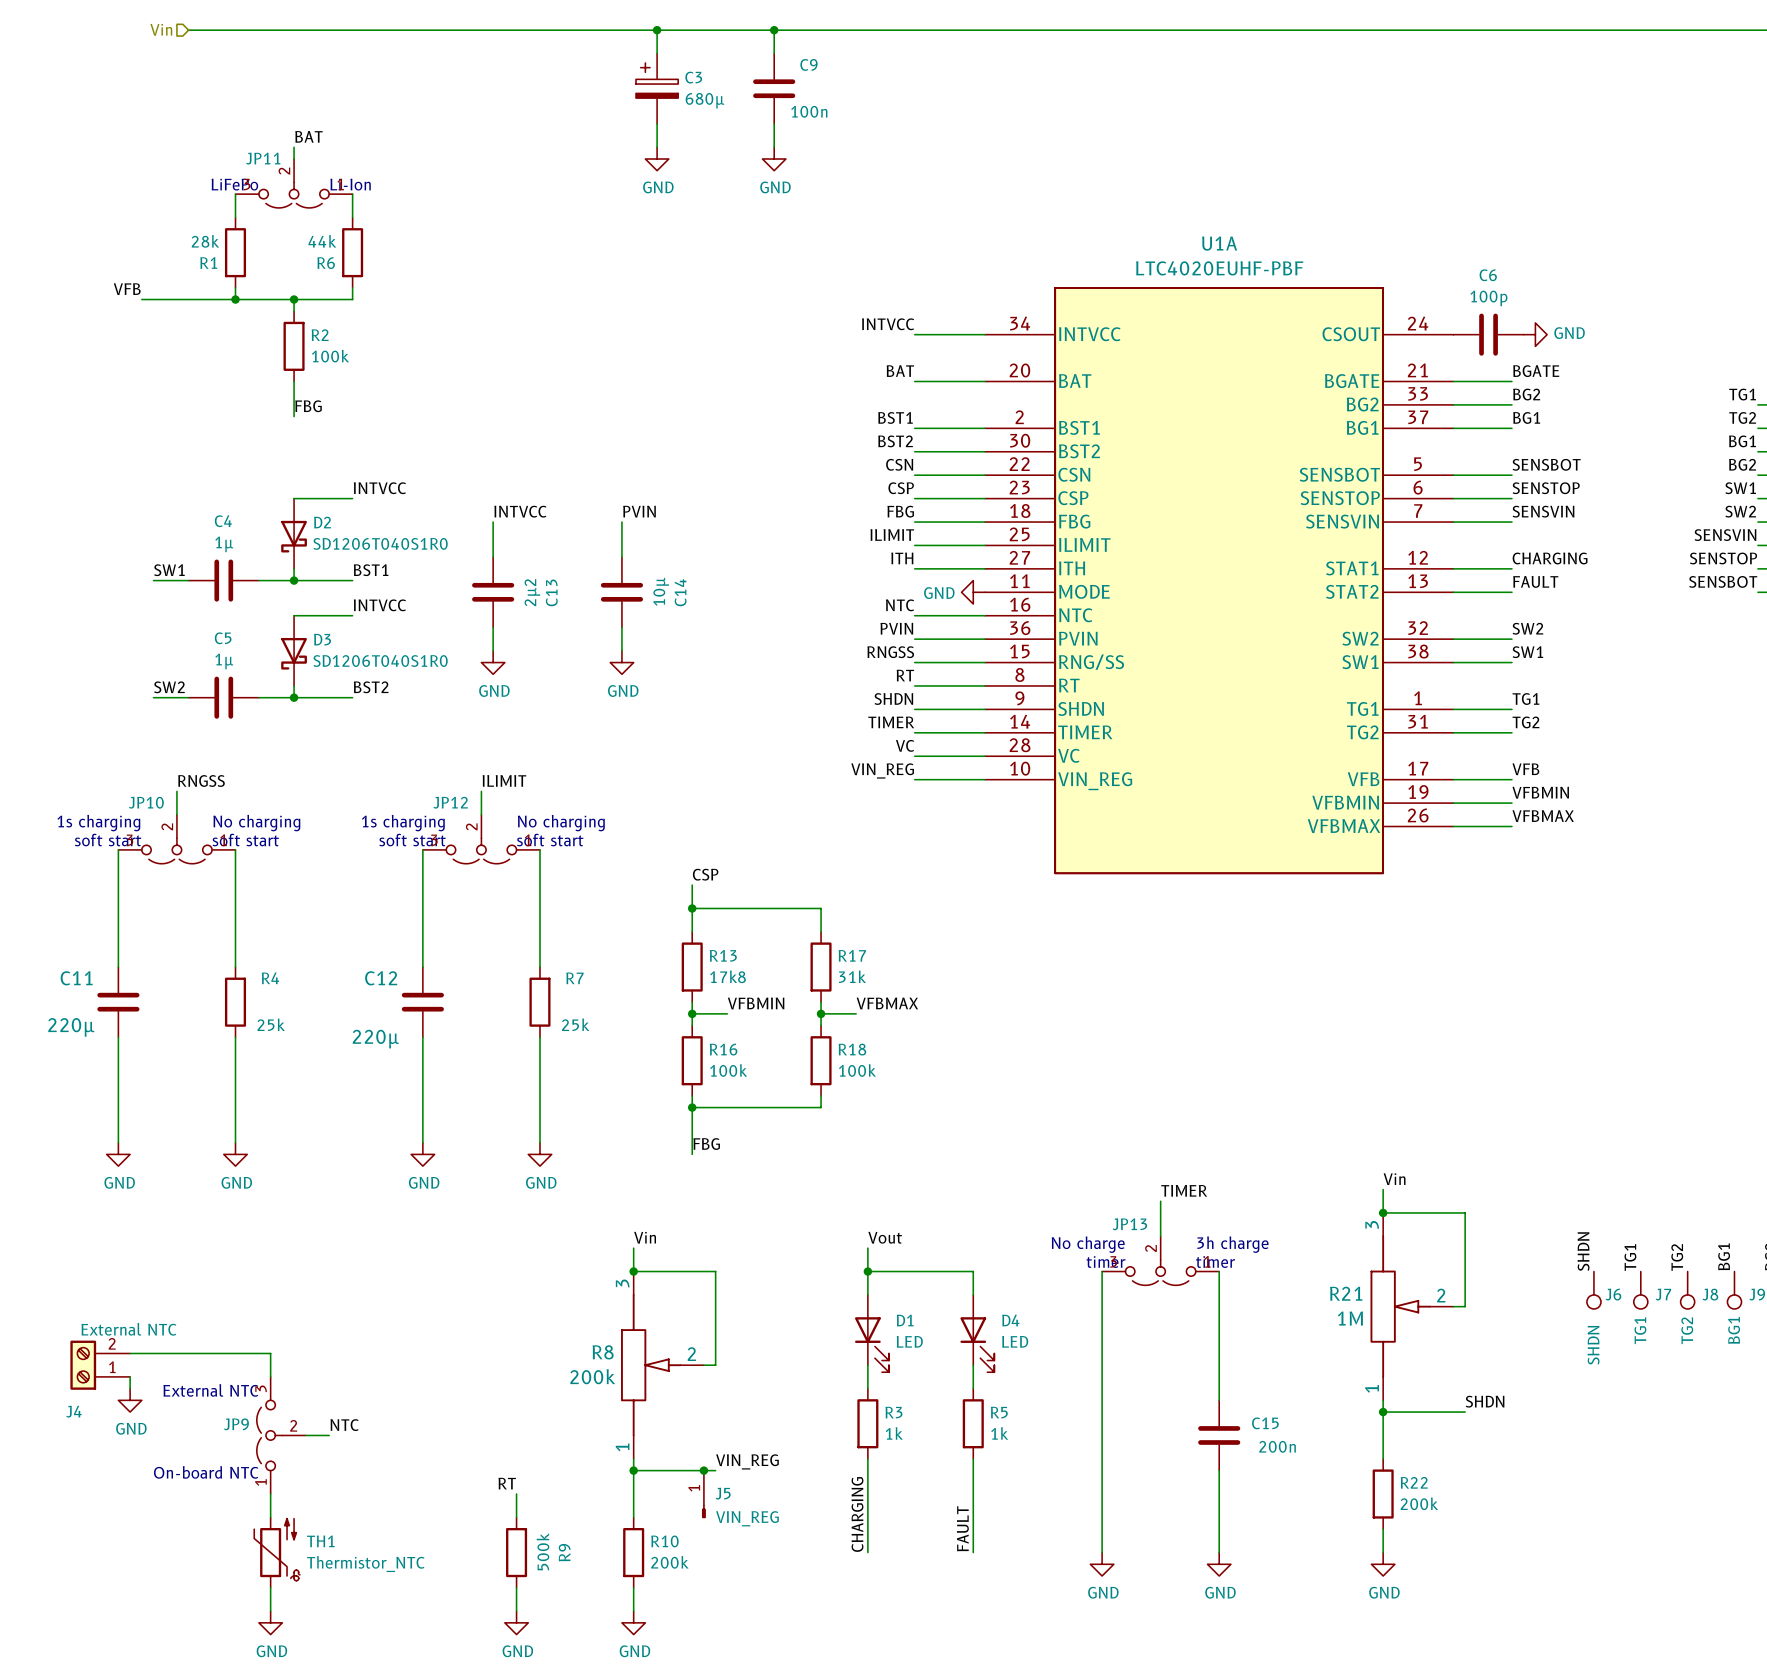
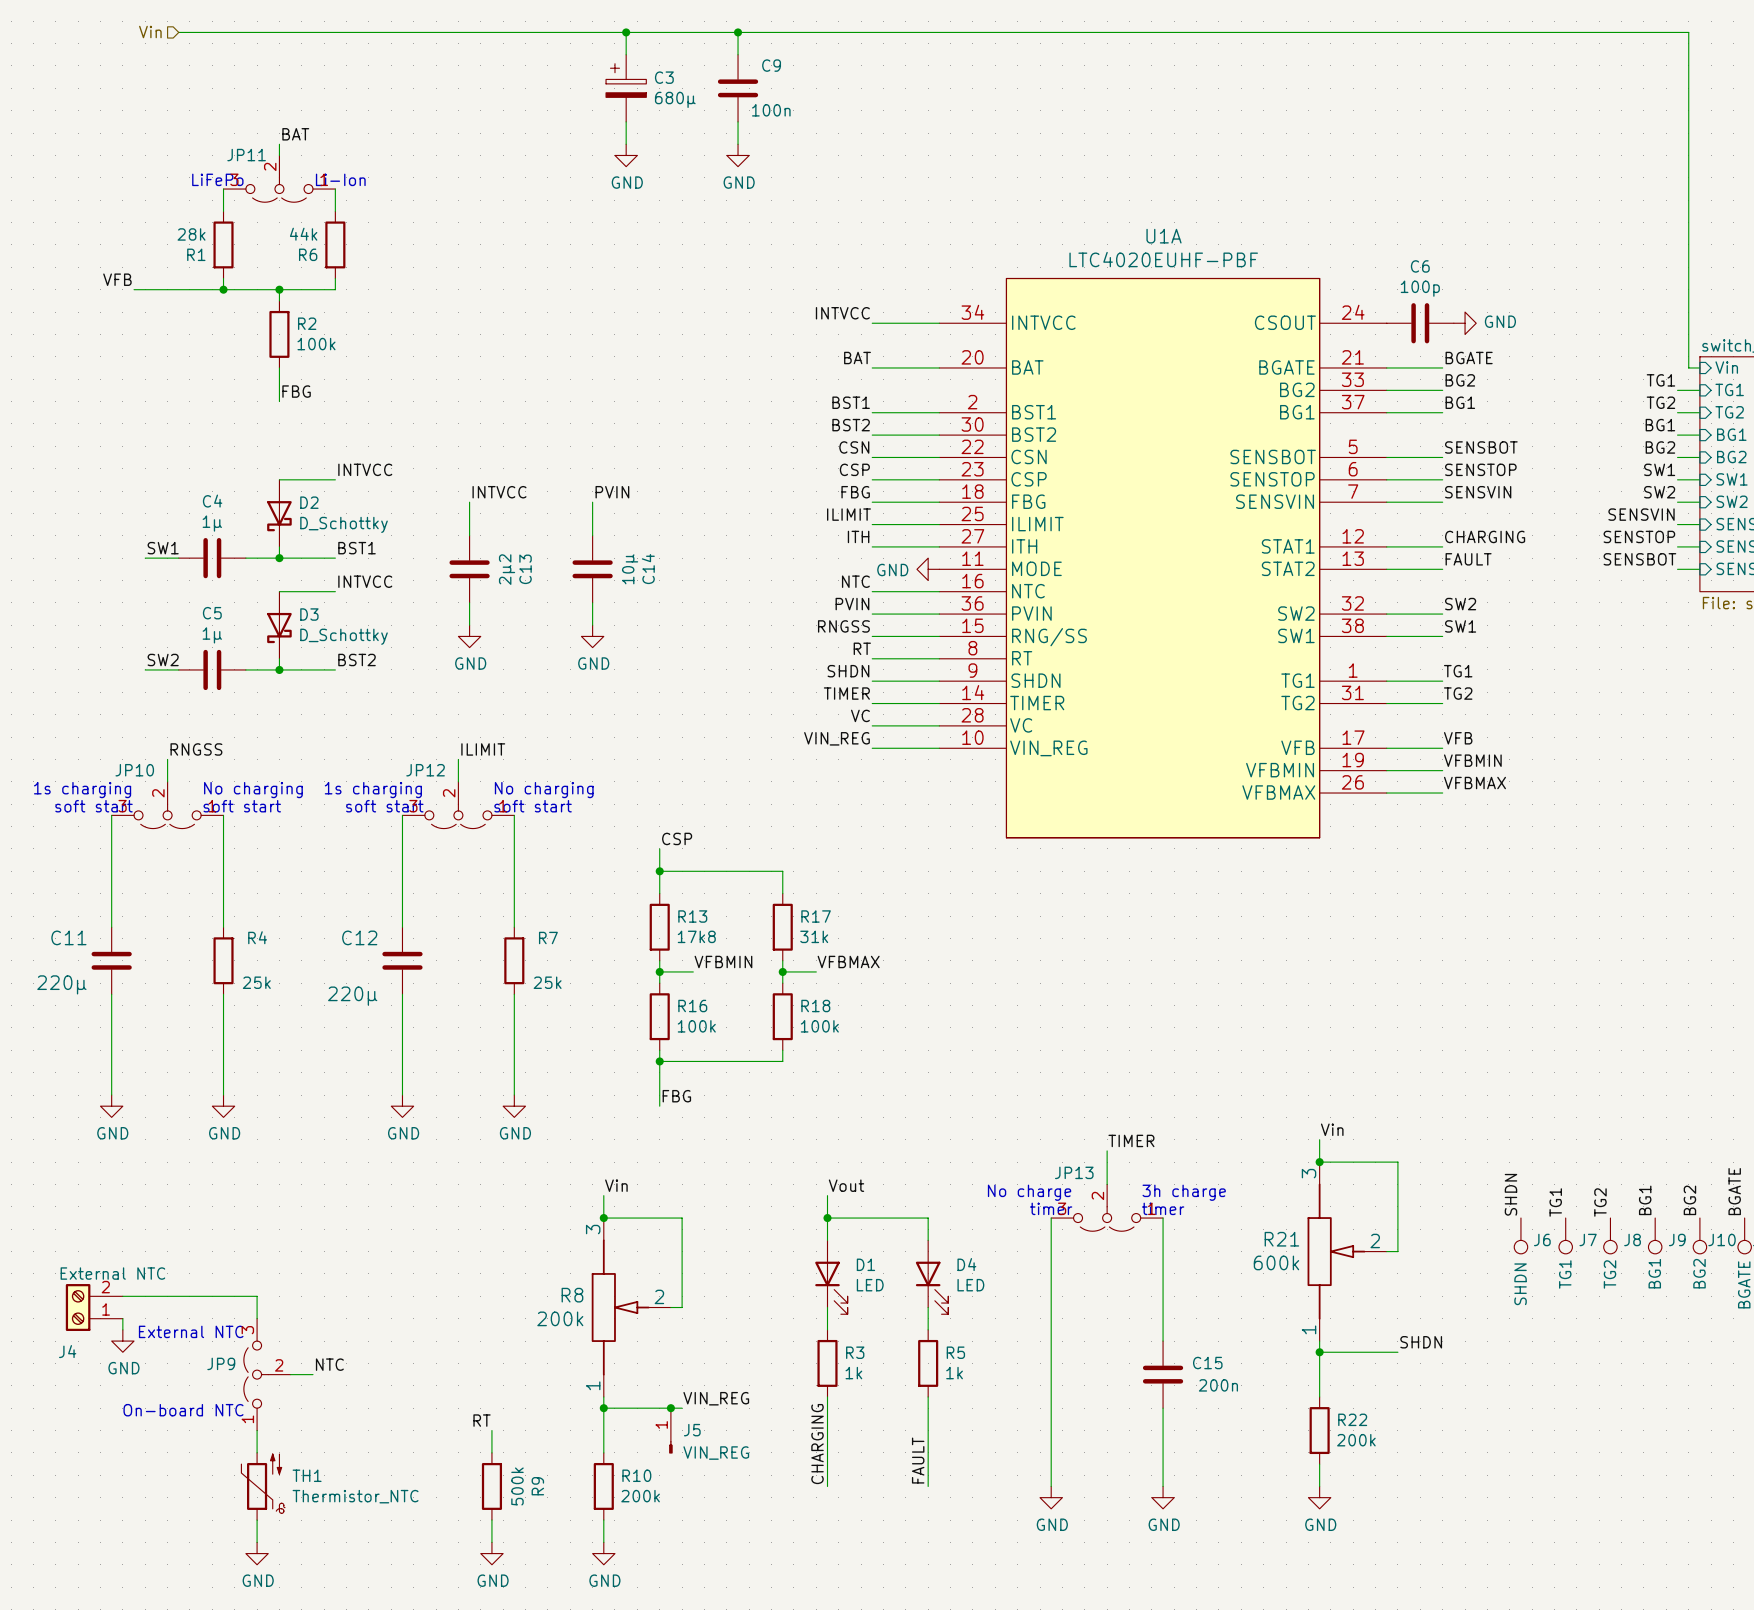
D2 value: SD1206T040S1R0 (380, 543) -> D_Schottky (344, 524)
D3 value: SD1206T040S1R0 (380, 661) -> D_Schottky (344, 636)
R21 value: 1M (1350, 1318) -> 600k (1276, 1262)

